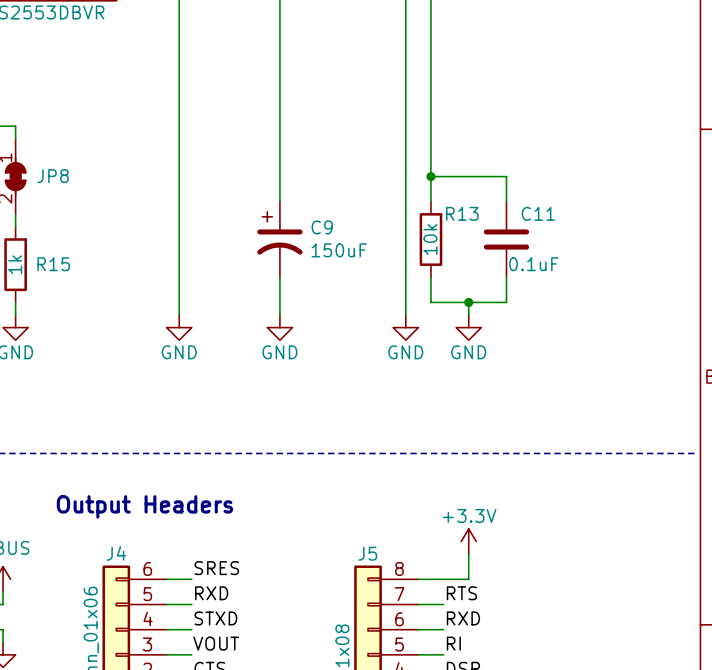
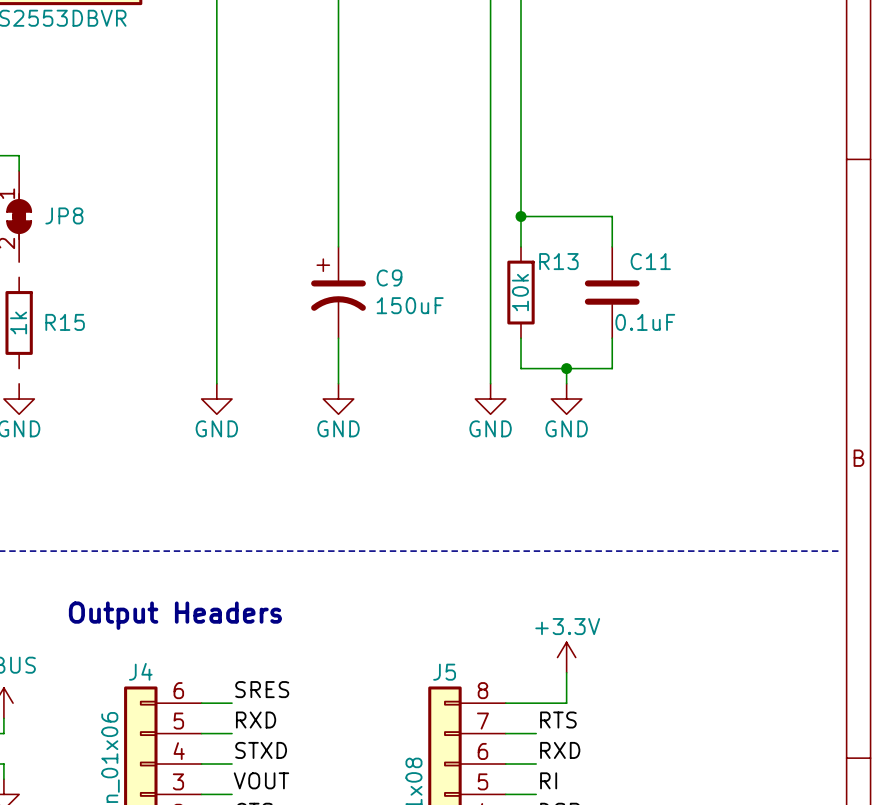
wire: (15, 214) (15, 226) -> none
wire: (15, 302) (15, 315) -> none

